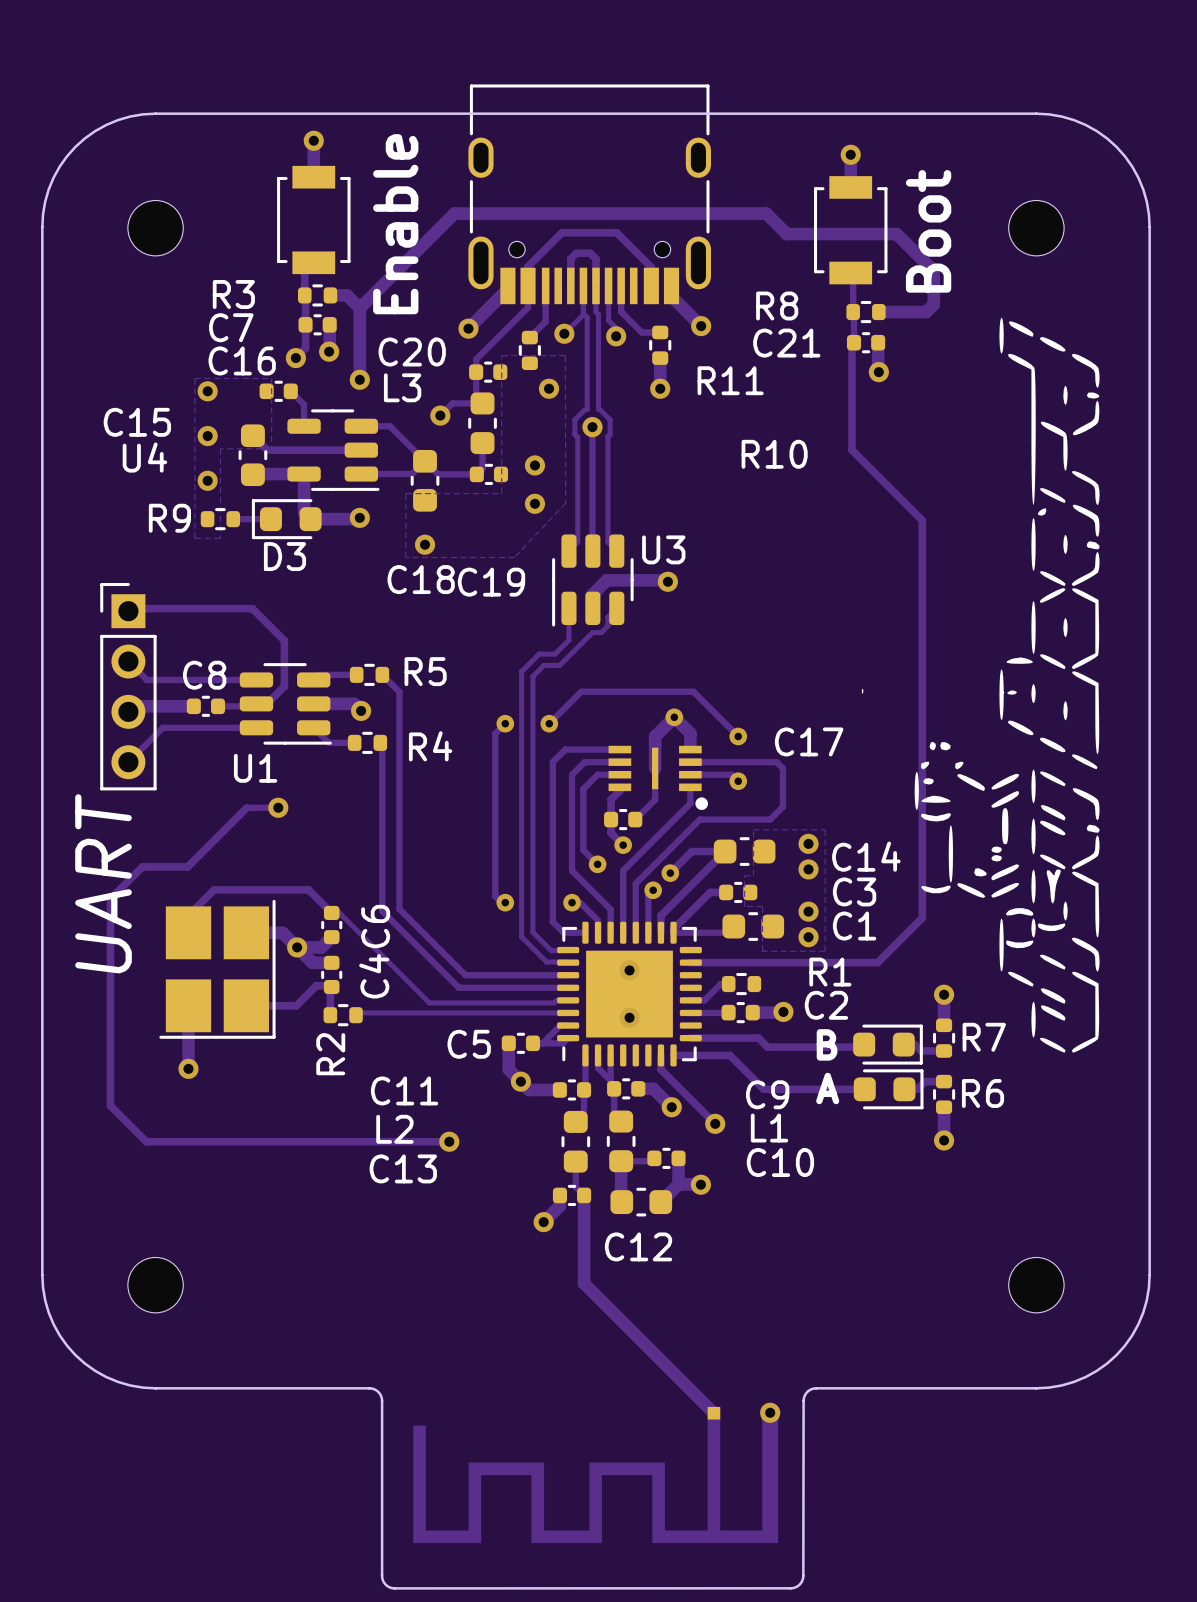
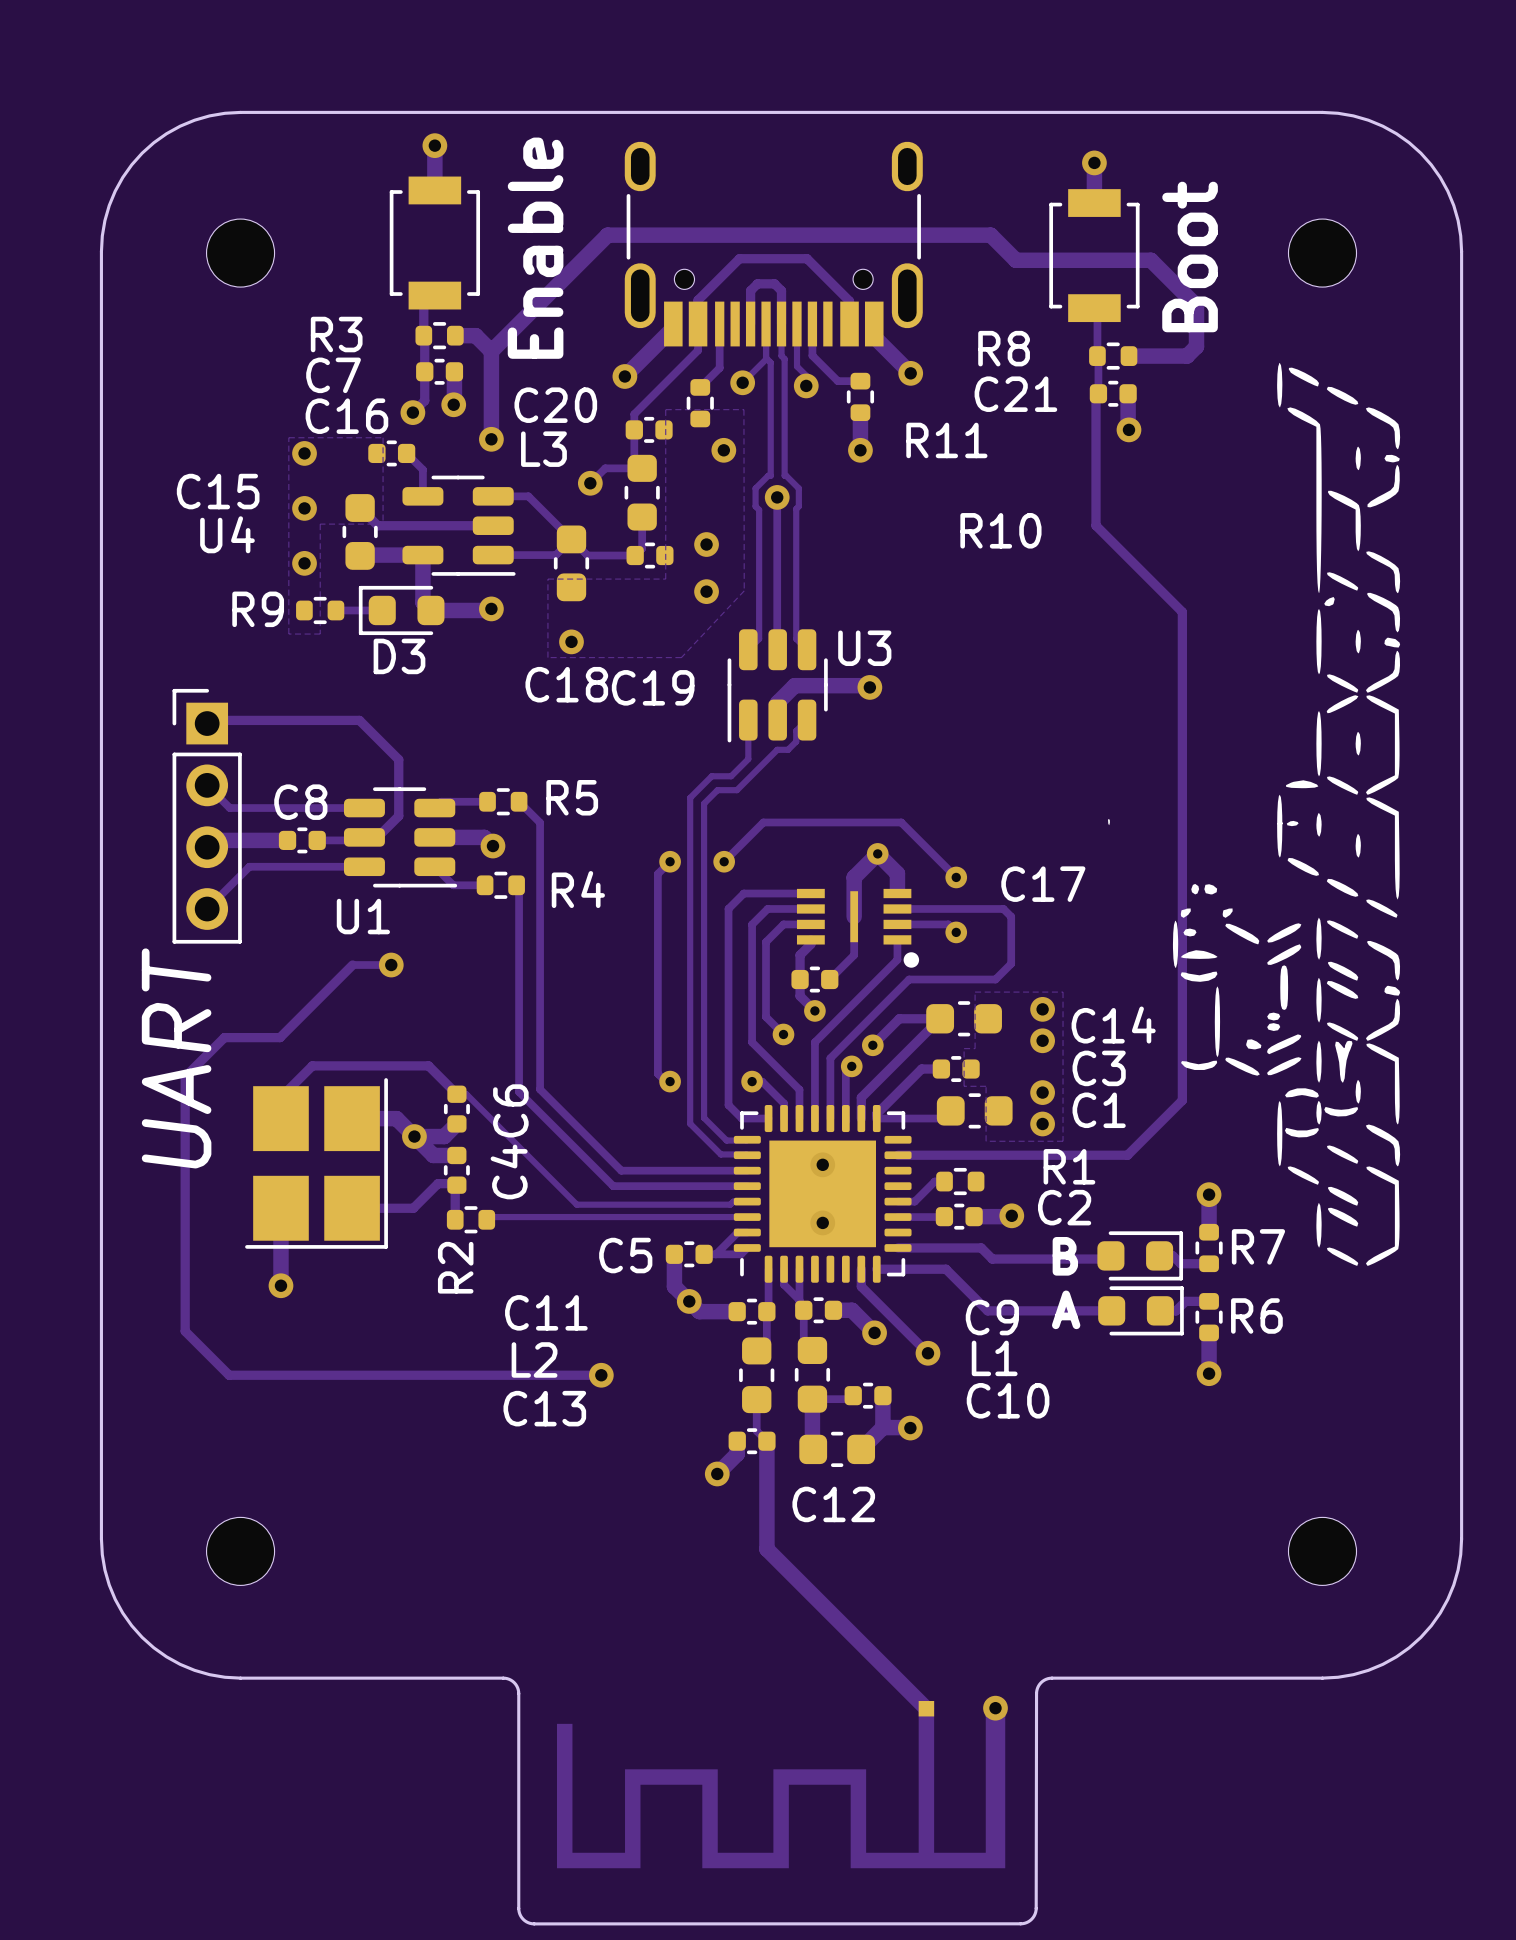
part: (589, 194) -> none

